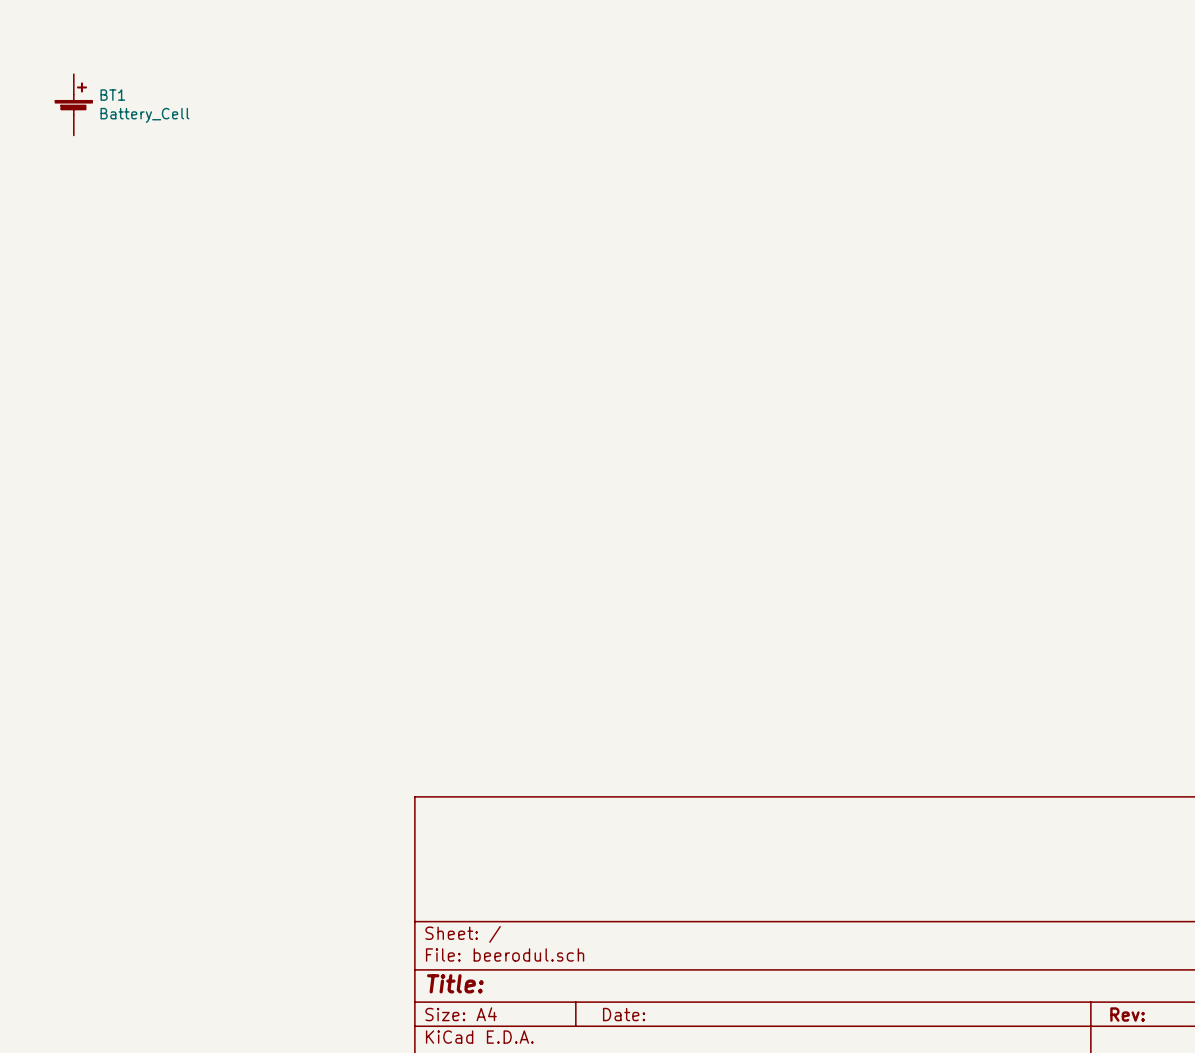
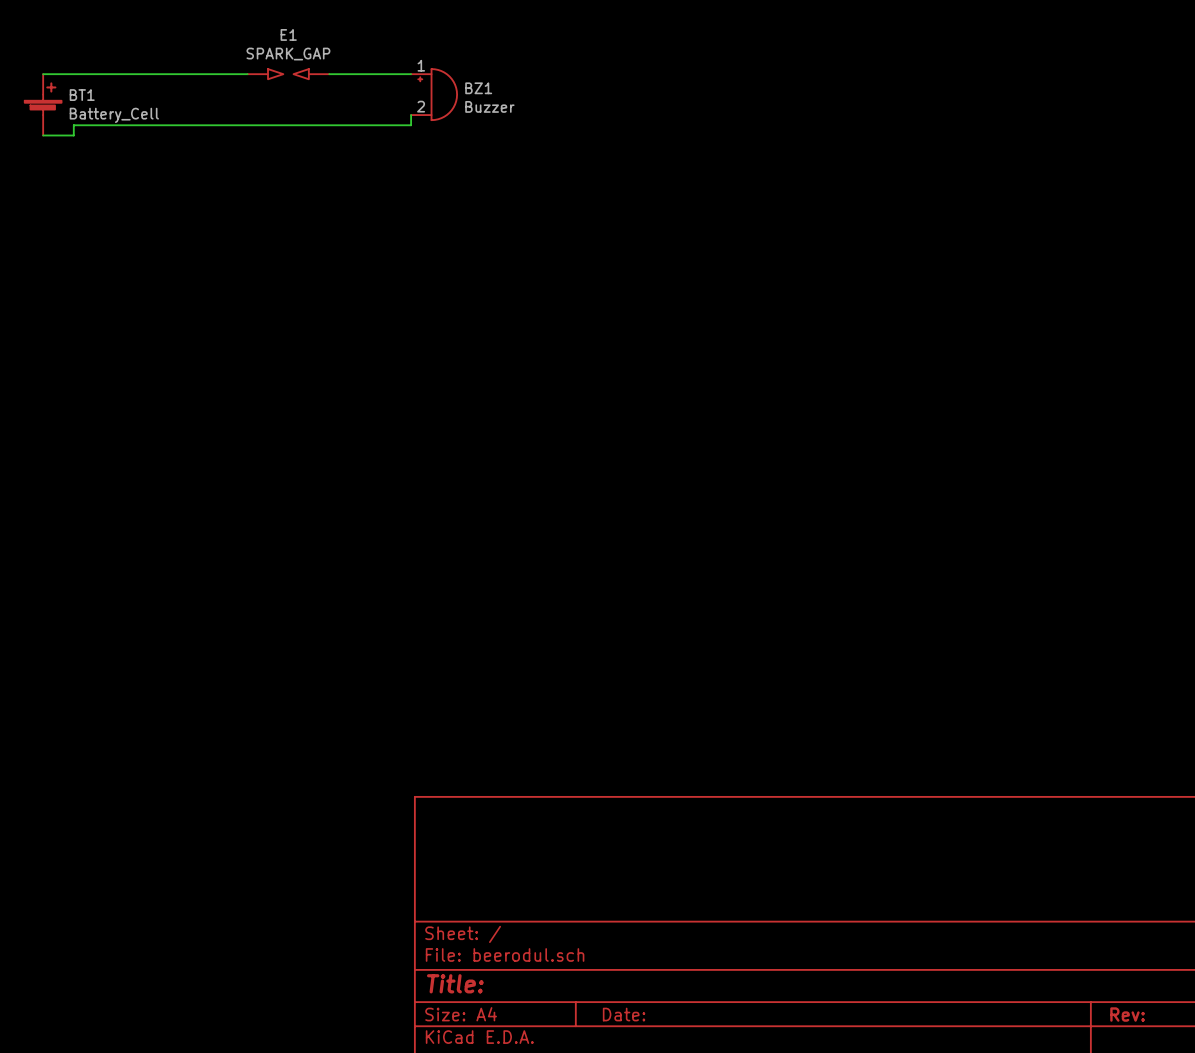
wire: none -> (43, 74) (247, 74)
E1: none -> SPARK_GAP (288, 74)
wire: none -> (329, 74) (411, 74)
BZ1: none -> Buzzer (434, 94)
BT1 position: (73, 104) -> (43, 104)
wire: none -> (411, 115) (411, 125) (73, 125) (73, 135) (43, 135)

